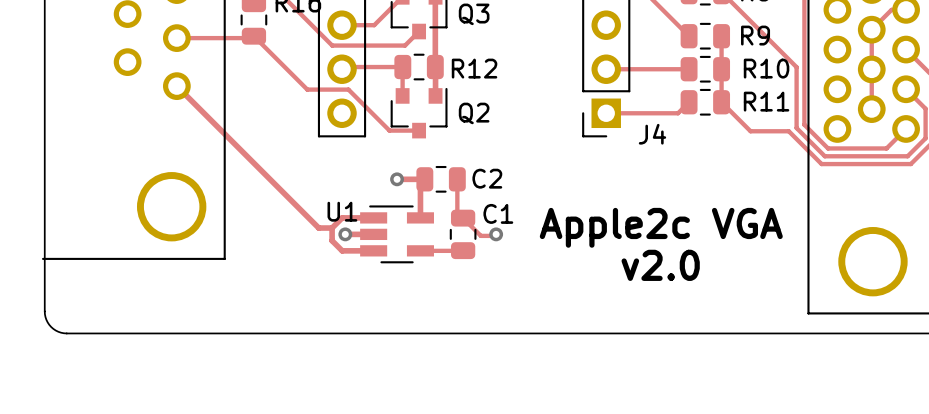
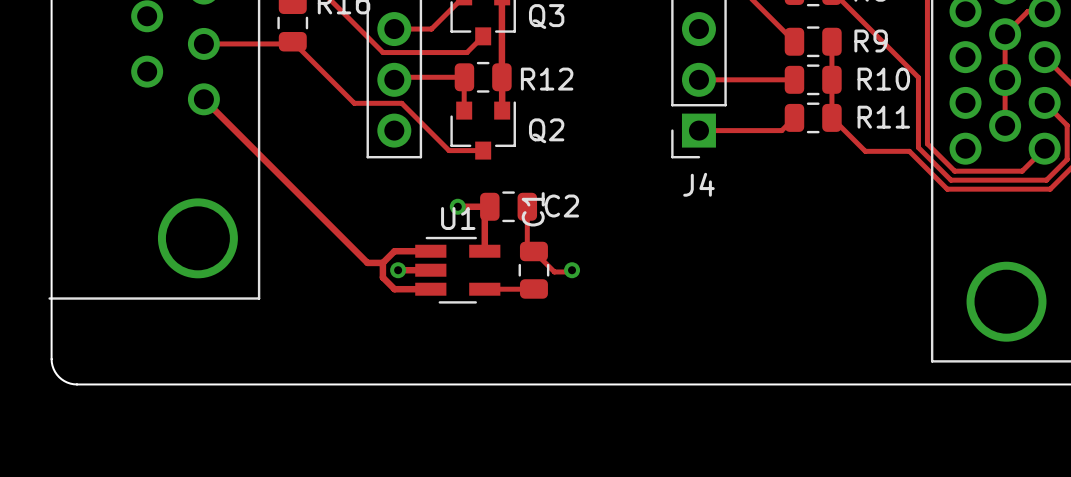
J4 name position: J4 (652, 134) -> J4 (698, 184)
U1 name position: U1 (342, 211) -> U1 (458, 218)
C1 name rotation: 0° (498, 213) -> 90° counterclockwise (533, 209)
C1 name position: C1 (498, 213) -> C1 (533, 209)
text: Apple2c VGA (661, 227) -> none
text: v2.0 (660, 265) -> none

